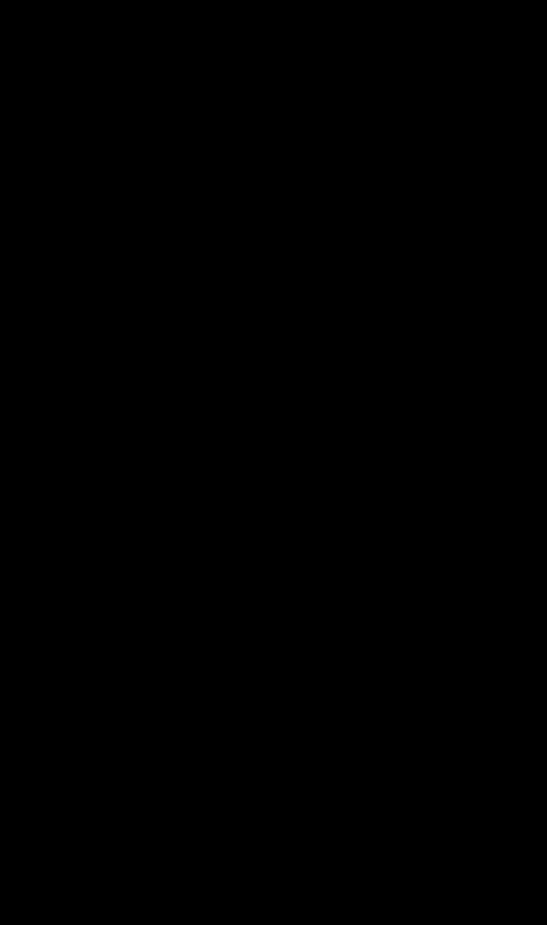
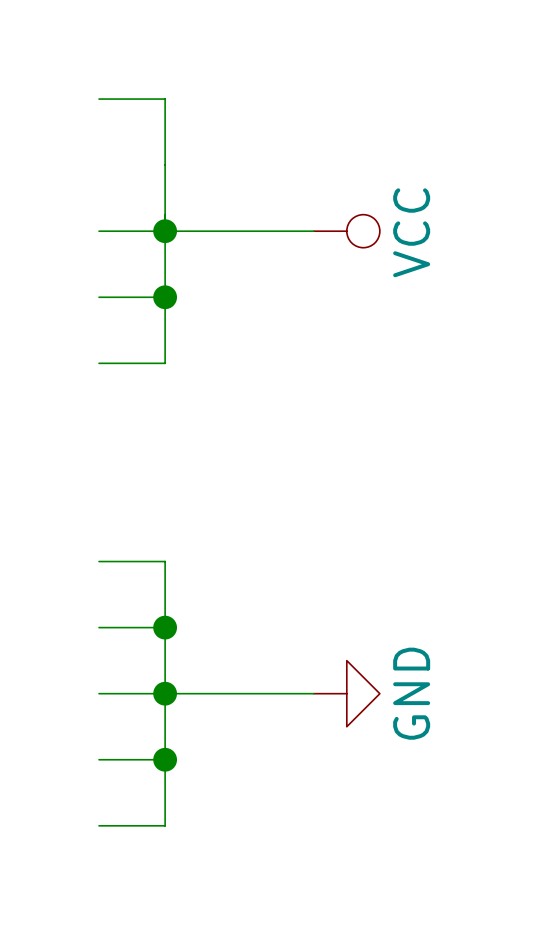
wire: none -> (99, 99) (165, 99) (165, 363) (99, 363)
wire: none -> (99, 231) (313, 231)
junction: none -> (165, 231)
power symbol: none -> VCC (346, 231)
wire: none -> (99, 297) (165, 297)
junction: none -> (165, 297)
wire: none -> (99, 561) (165, 561) (165, 825) (99, 825)
wire: none -> (99, 627) (165, 627)
junction: none -> (165, 627)
wire: none -> (99, 693) (313, 693)
junction: none -> (165, 693)
power symbol: none -> GND (346, 693)
wire: none -> (99, 759) (165, 759)
junction: none -> (165, 759)

